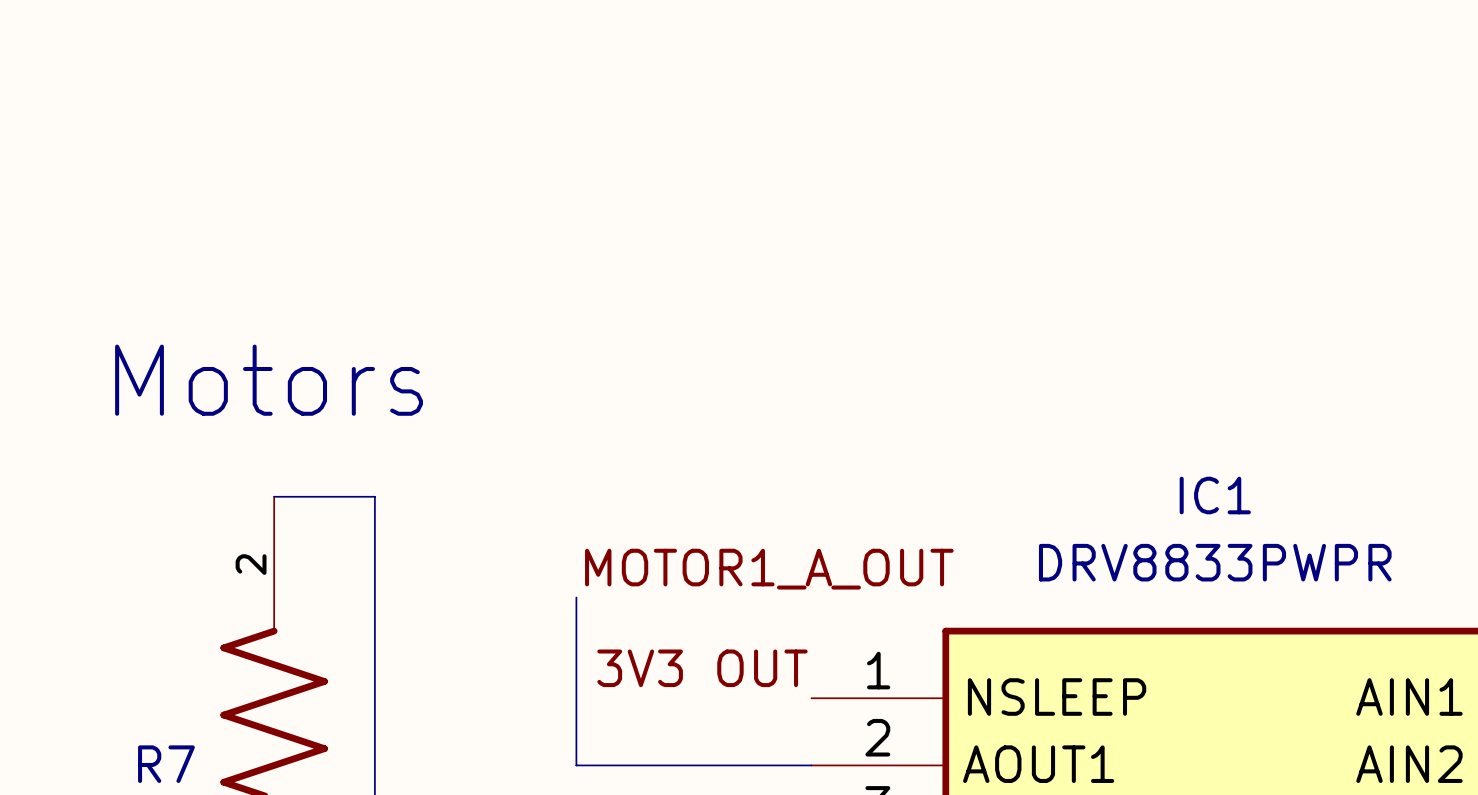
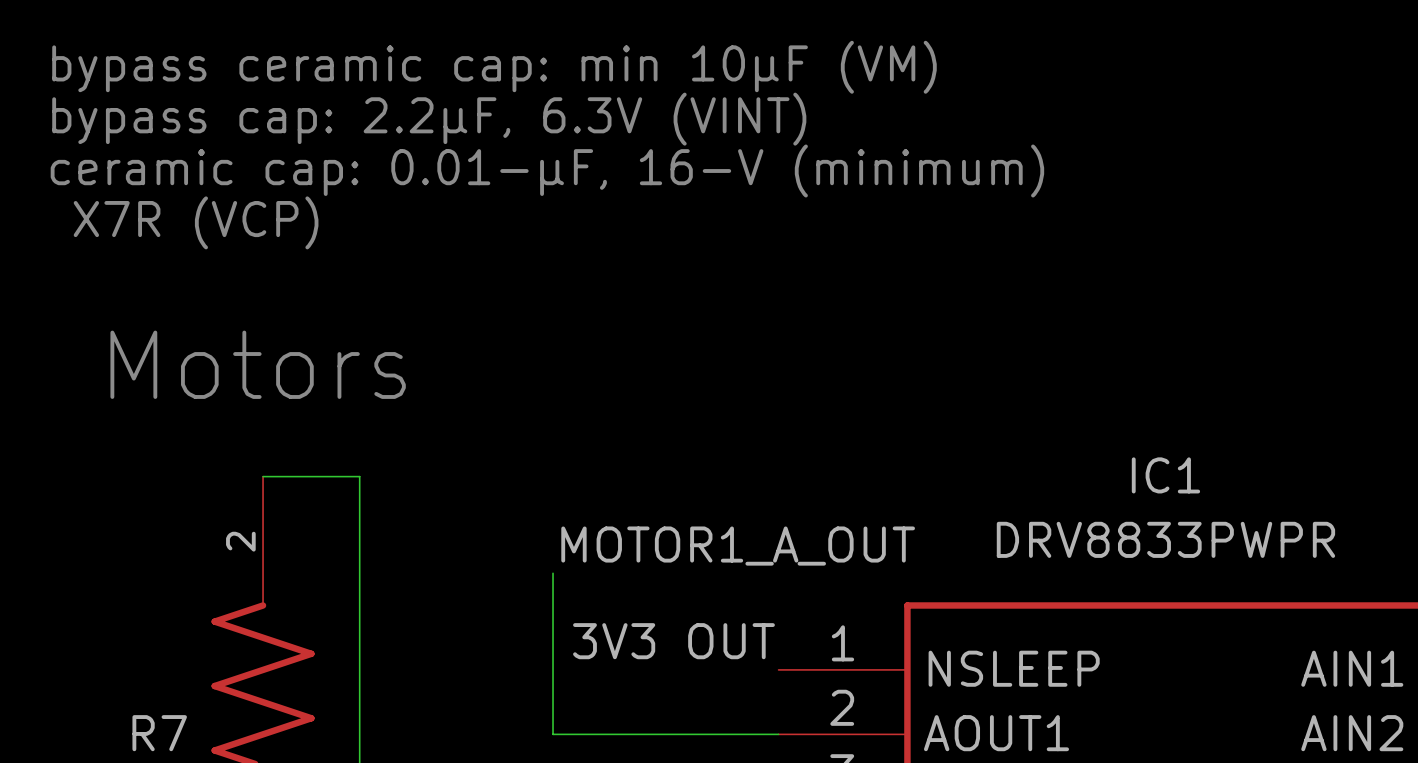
text: none -> bypass ceramic cap: min 10µF (VM) (494, 67)
text: none -> bypass cap: 2.2µF, 6.3V (VINT) (429, 119)
text: none -> ceramic cap: 0.01-μF, 16-V (minimum) (547, 171)
text: none -> X7R (VCP) (196, 222)

